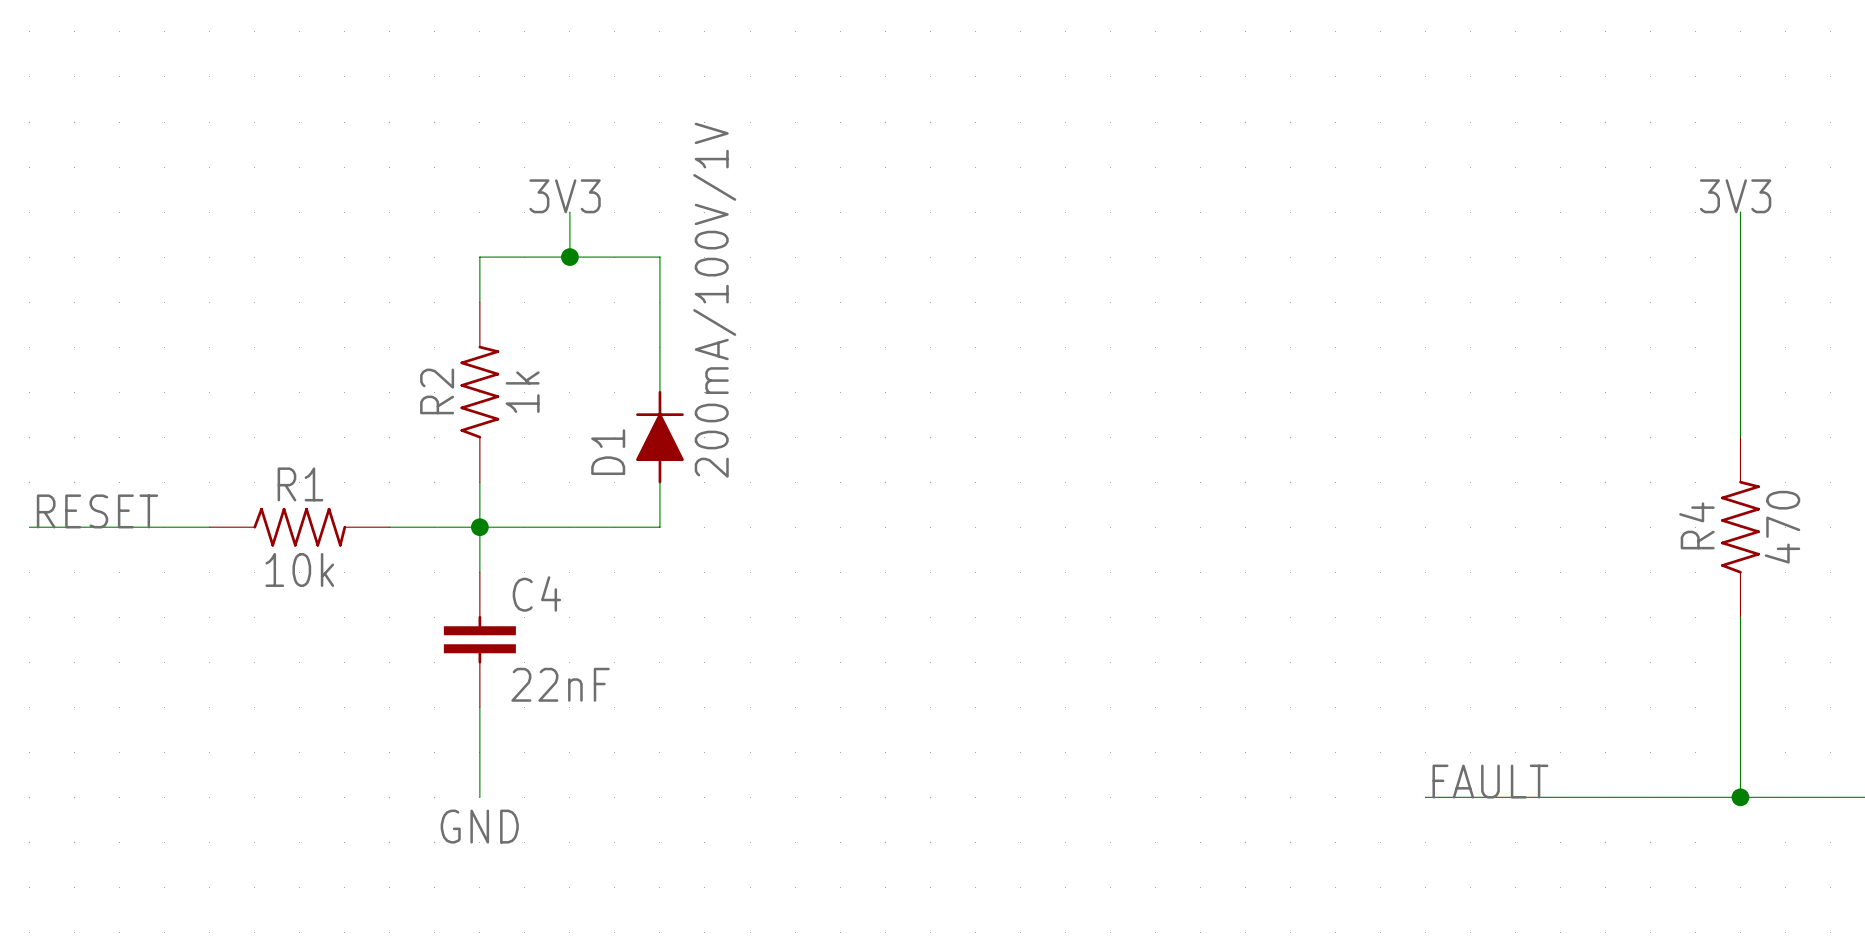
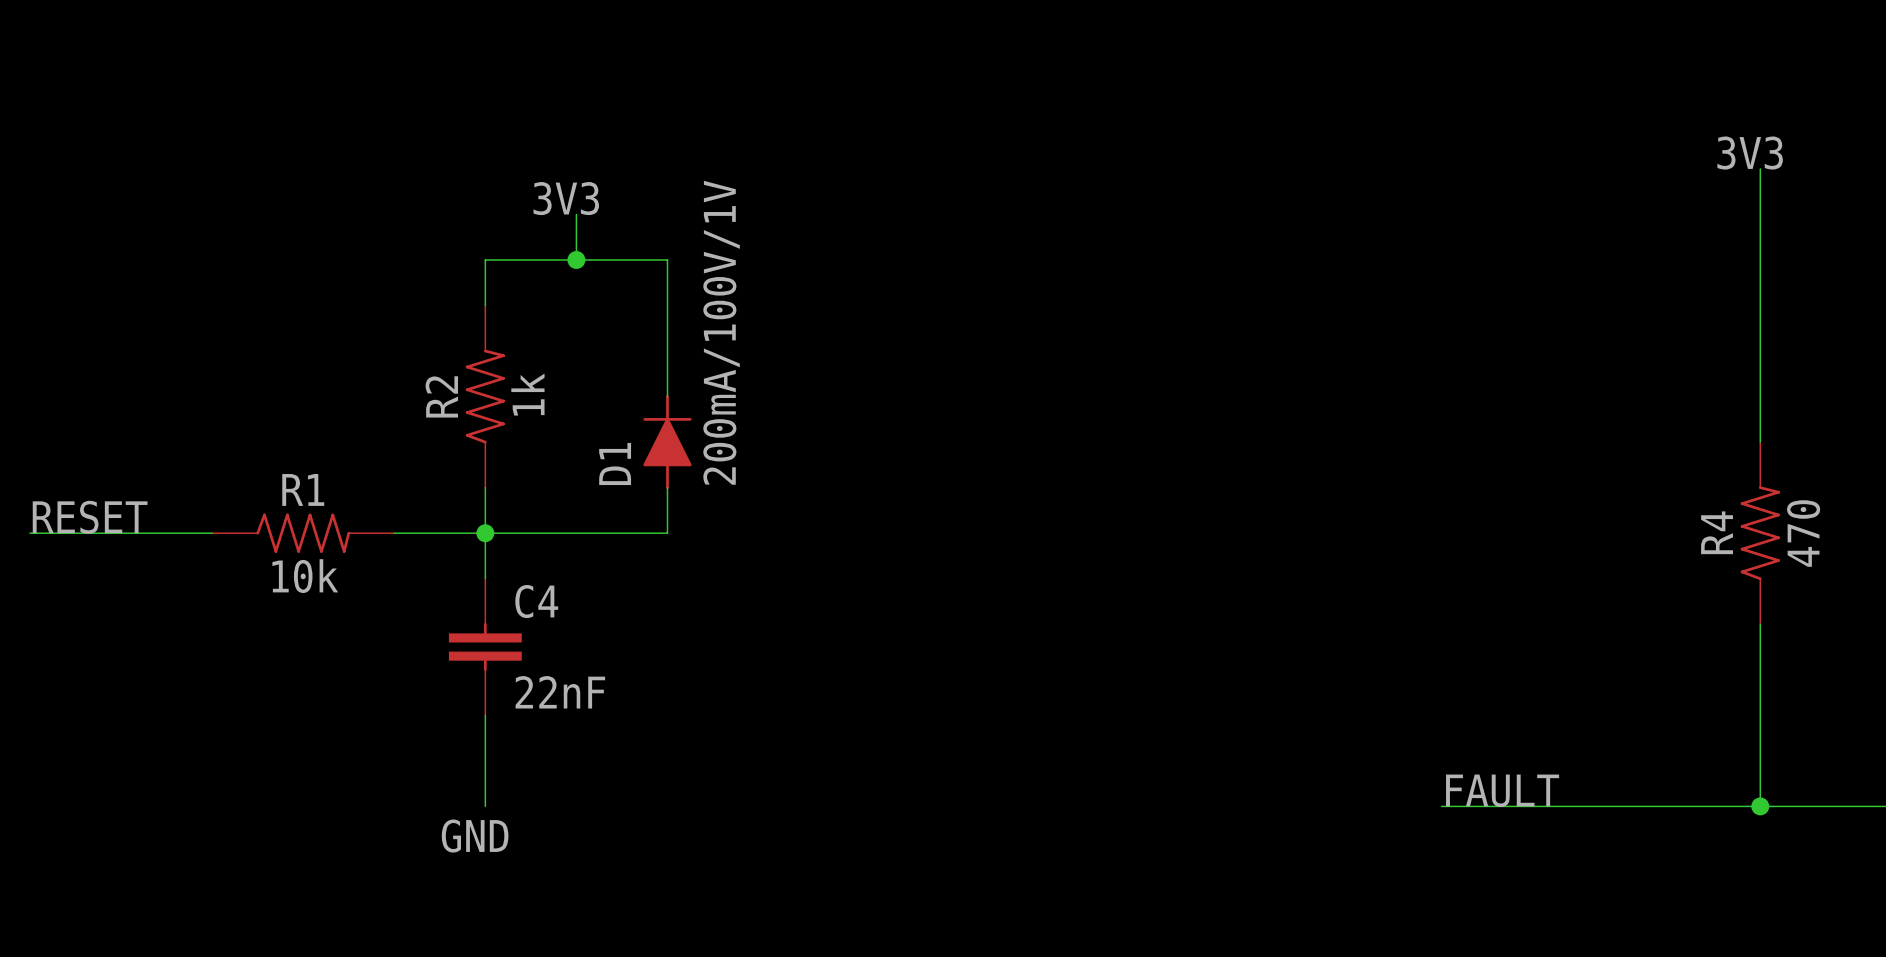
wire: none -> (1760, 168) (1760, 214)
label position: 3V3 (1735, 196) -> 3V3 (1750, 153)

